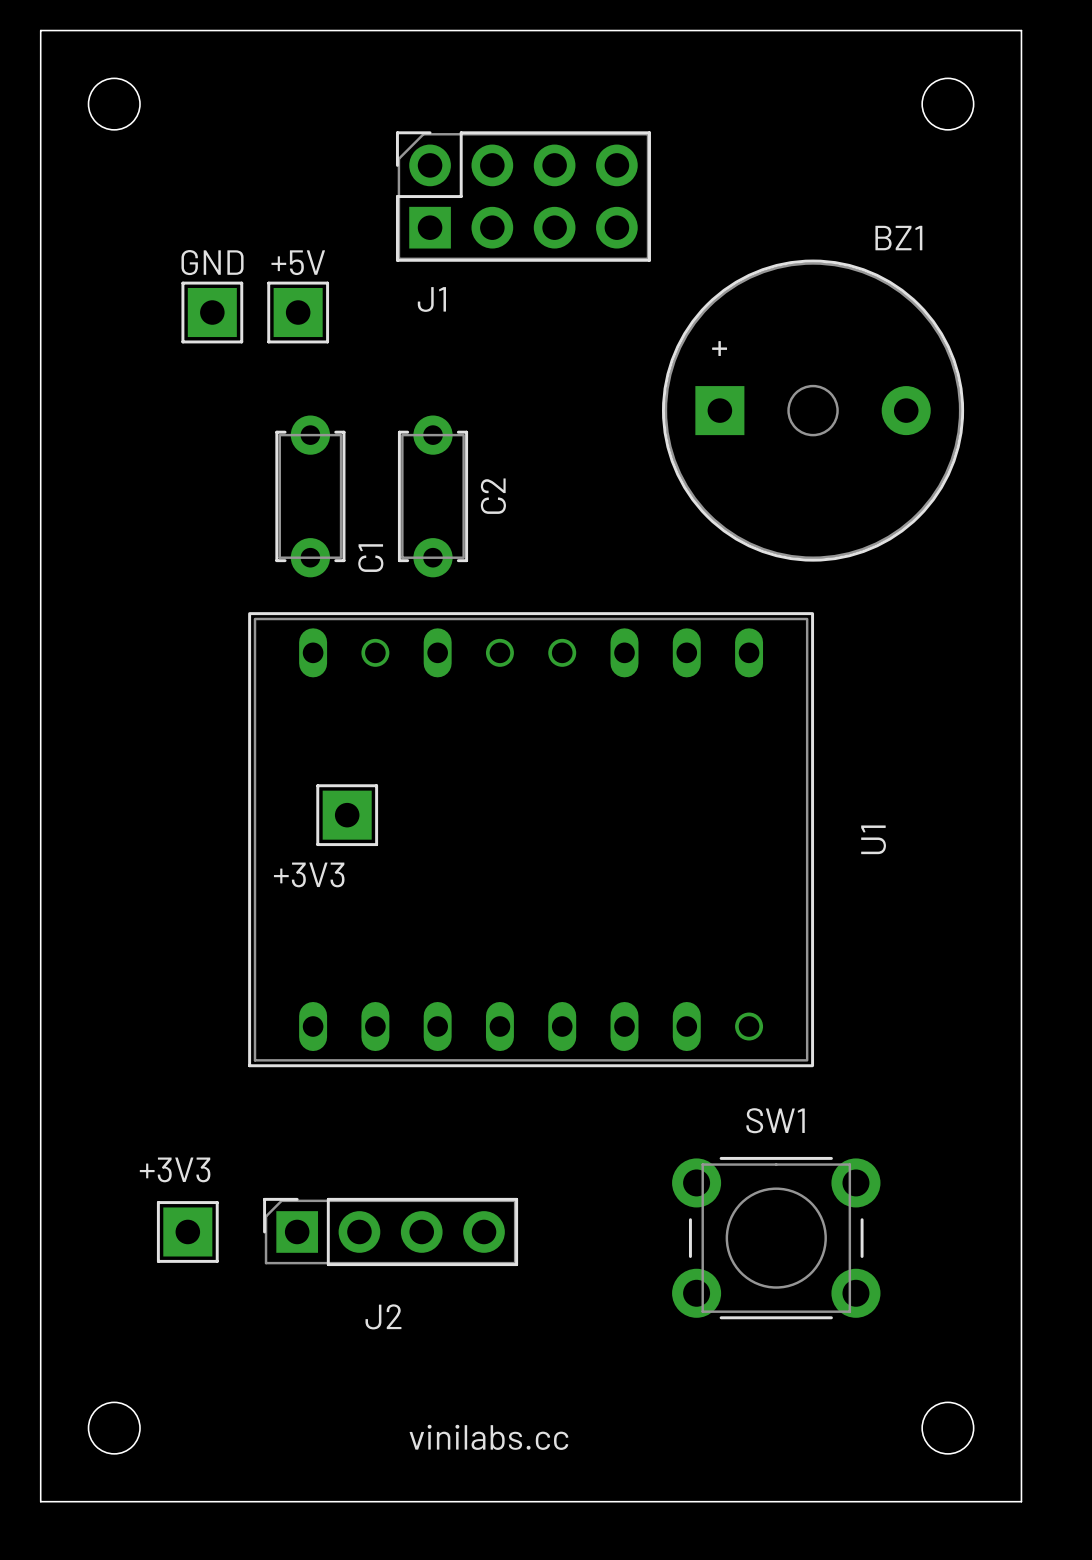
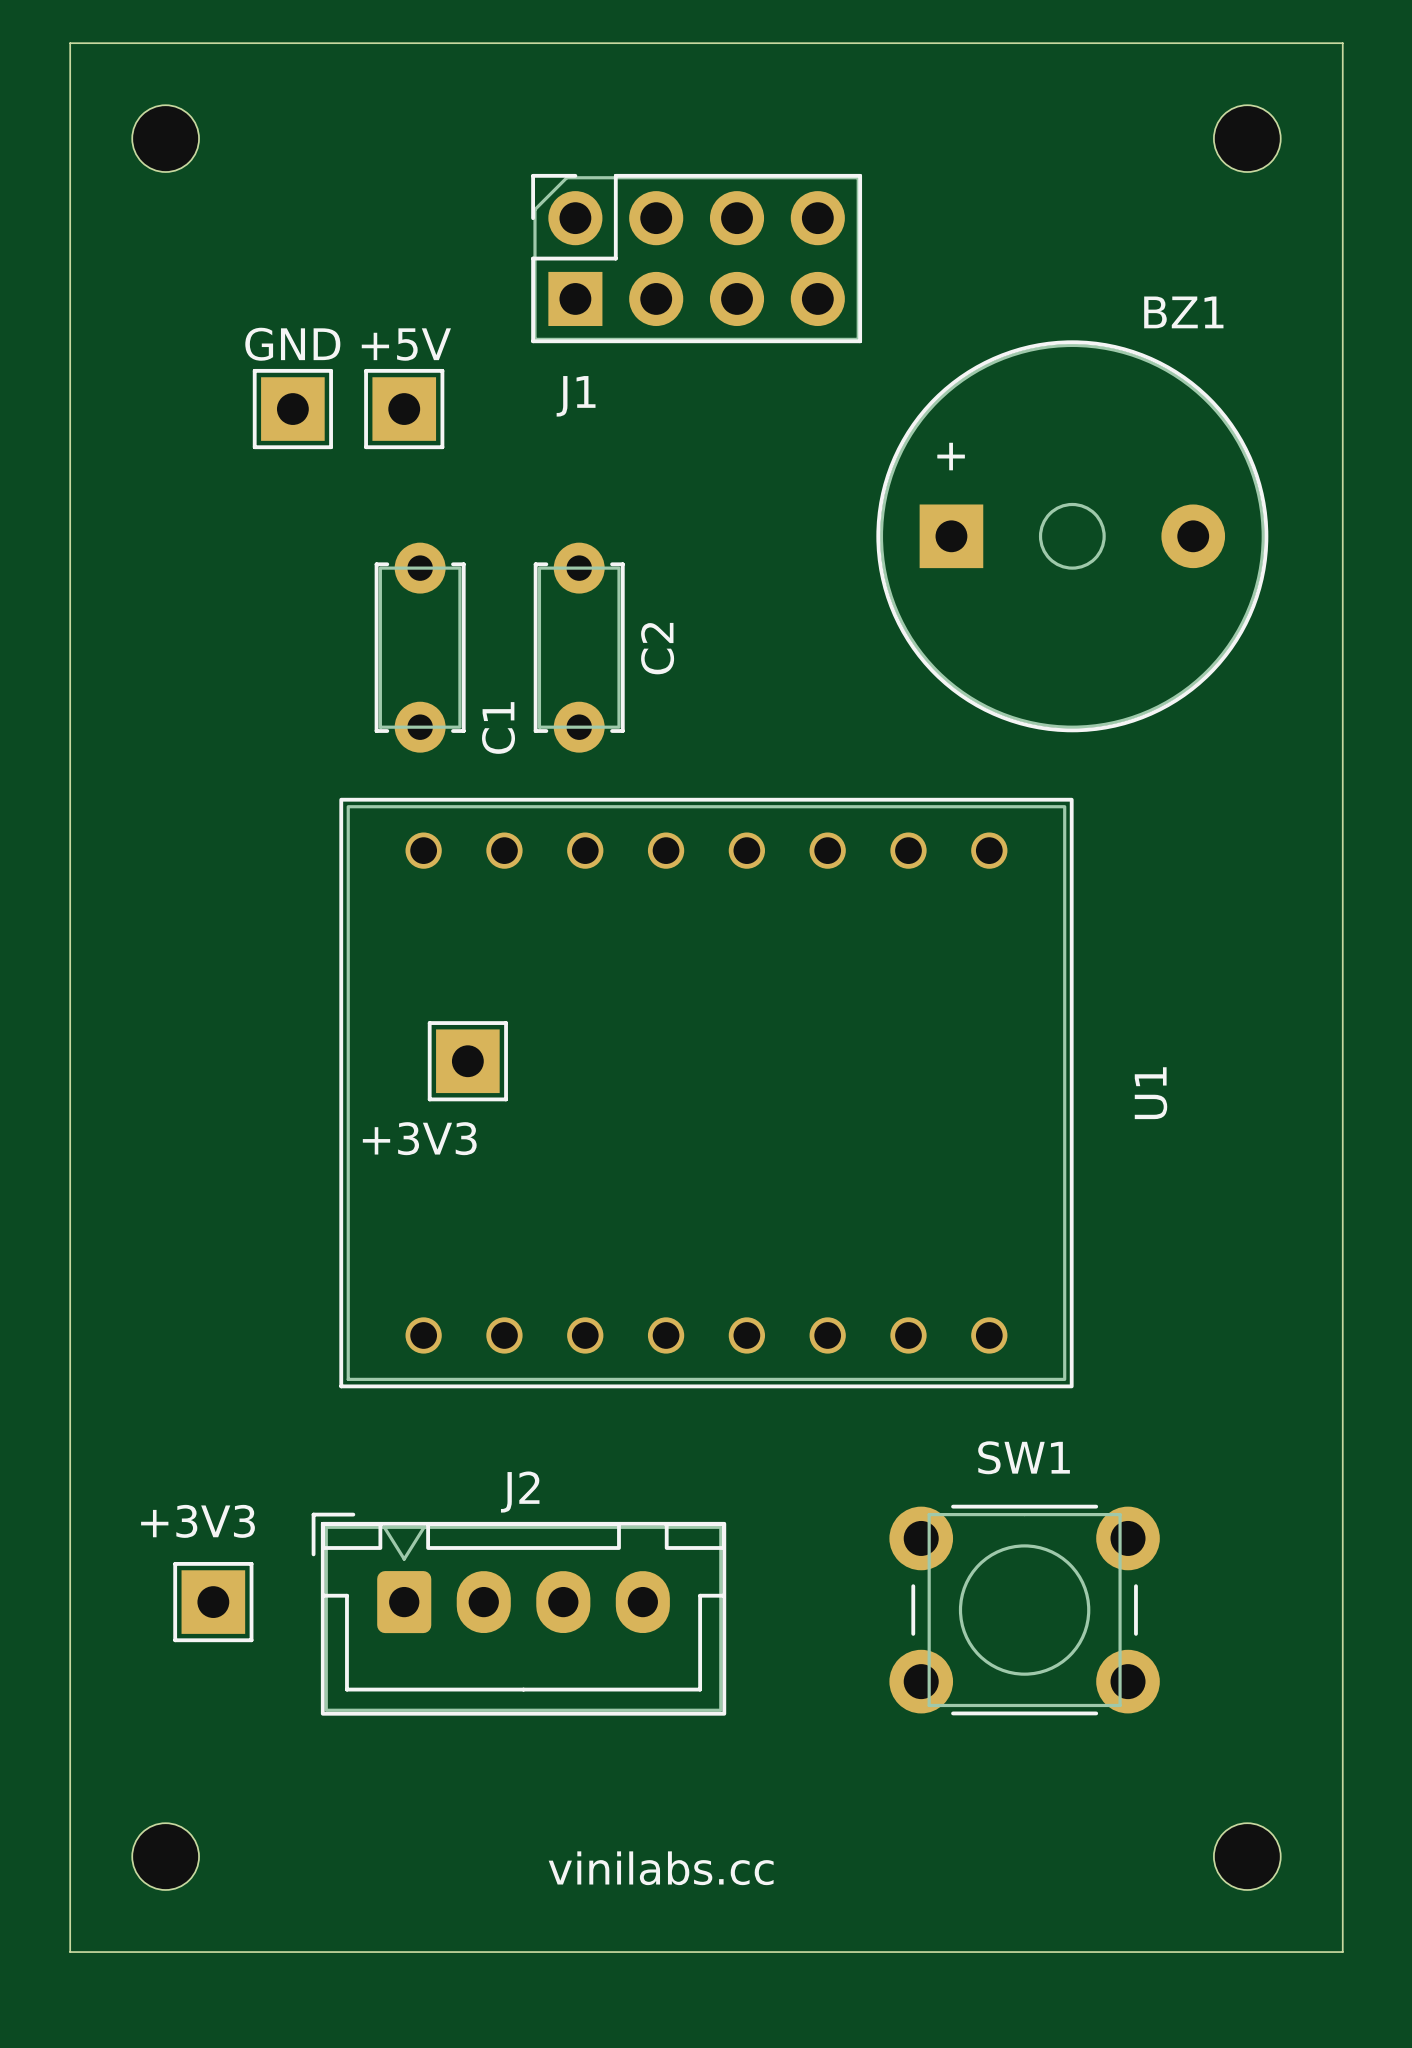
U1 footprint: [248, 612, 815, 1068] -> [339, 797, 1074, 1389]
J2 footprint: [263, 1197, 519, 1267] -> [311, 1512, 727, 1716]
part position: (187, 1231) -> (213, 1602)
J2 name position: J2 (383, 1316) -> J2 (520, 1492)

